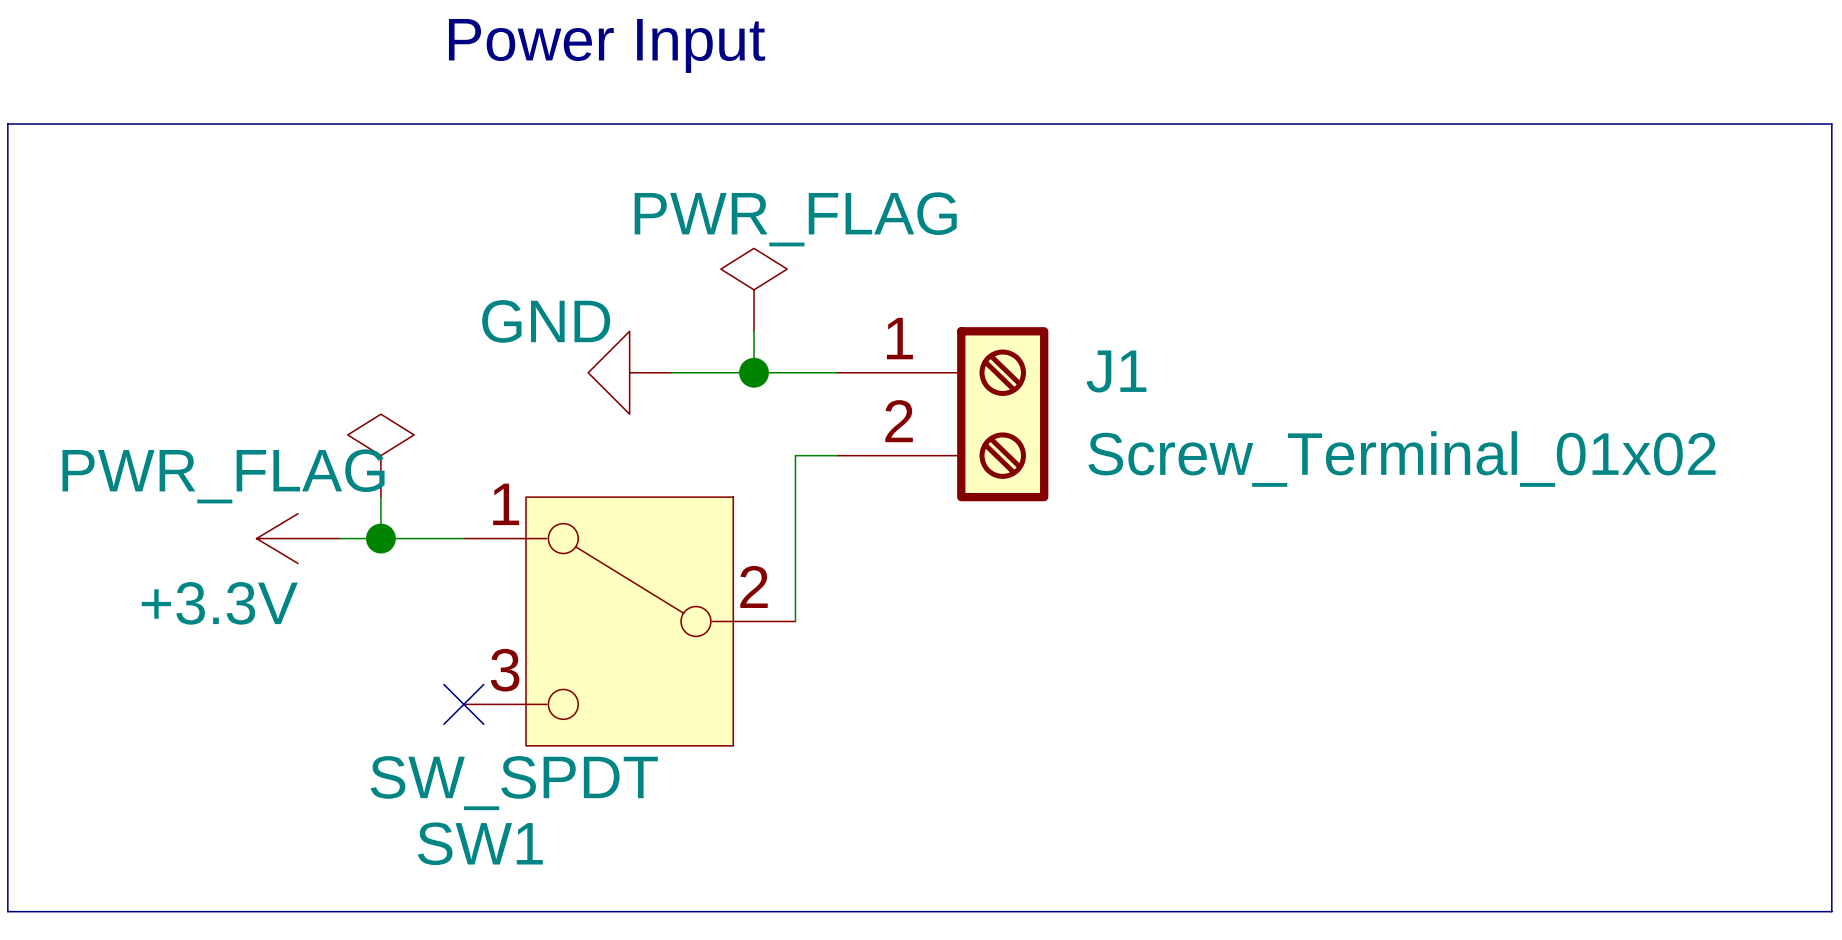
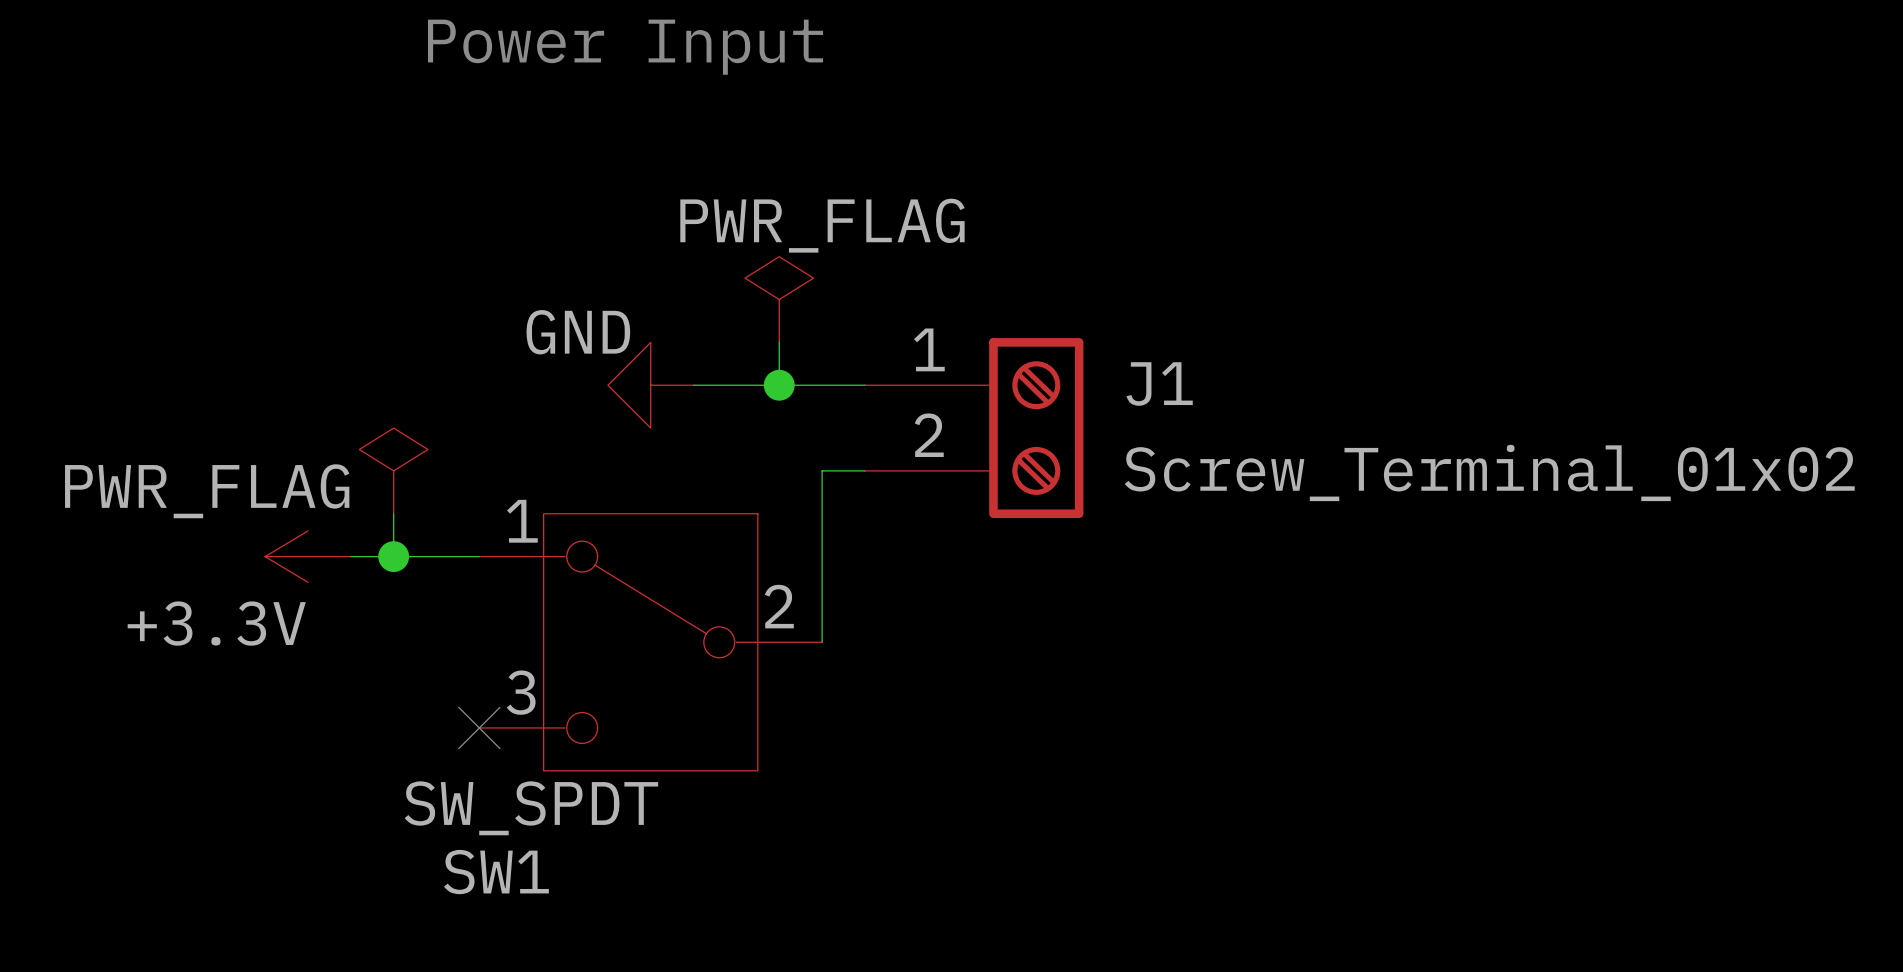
line: (7, 124) (7, 911) (1831, 911) (1831, 124) (7, 124) -> none

